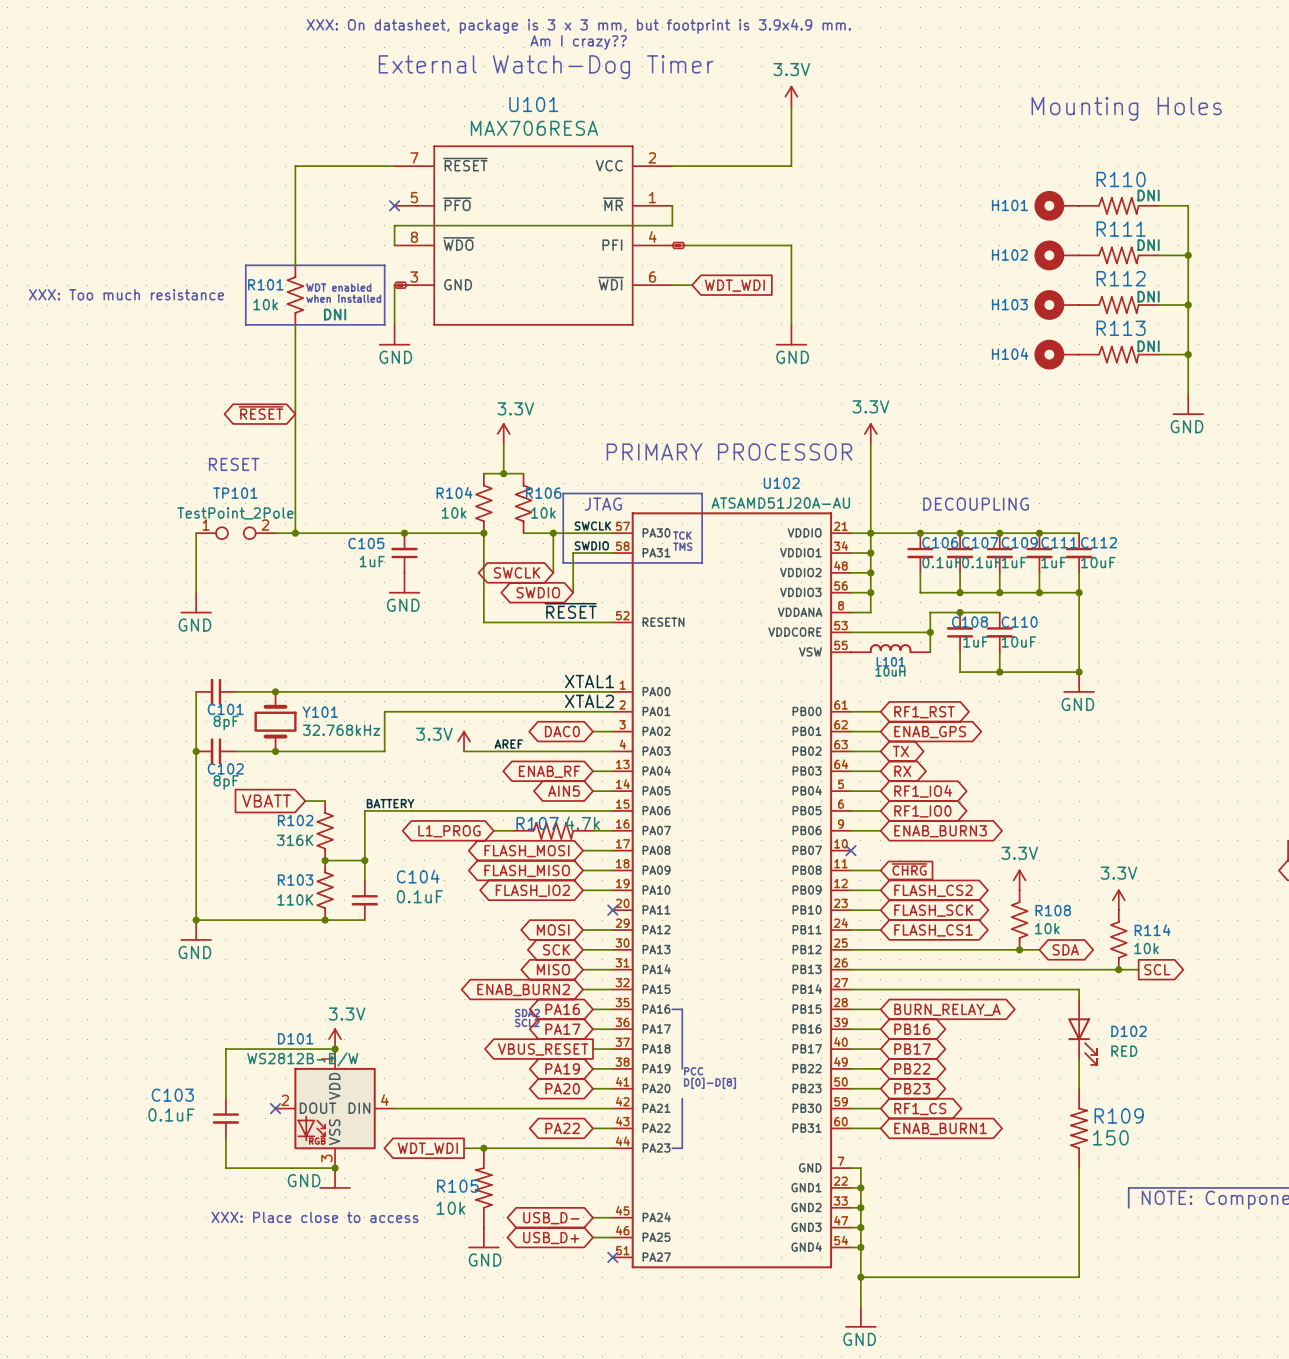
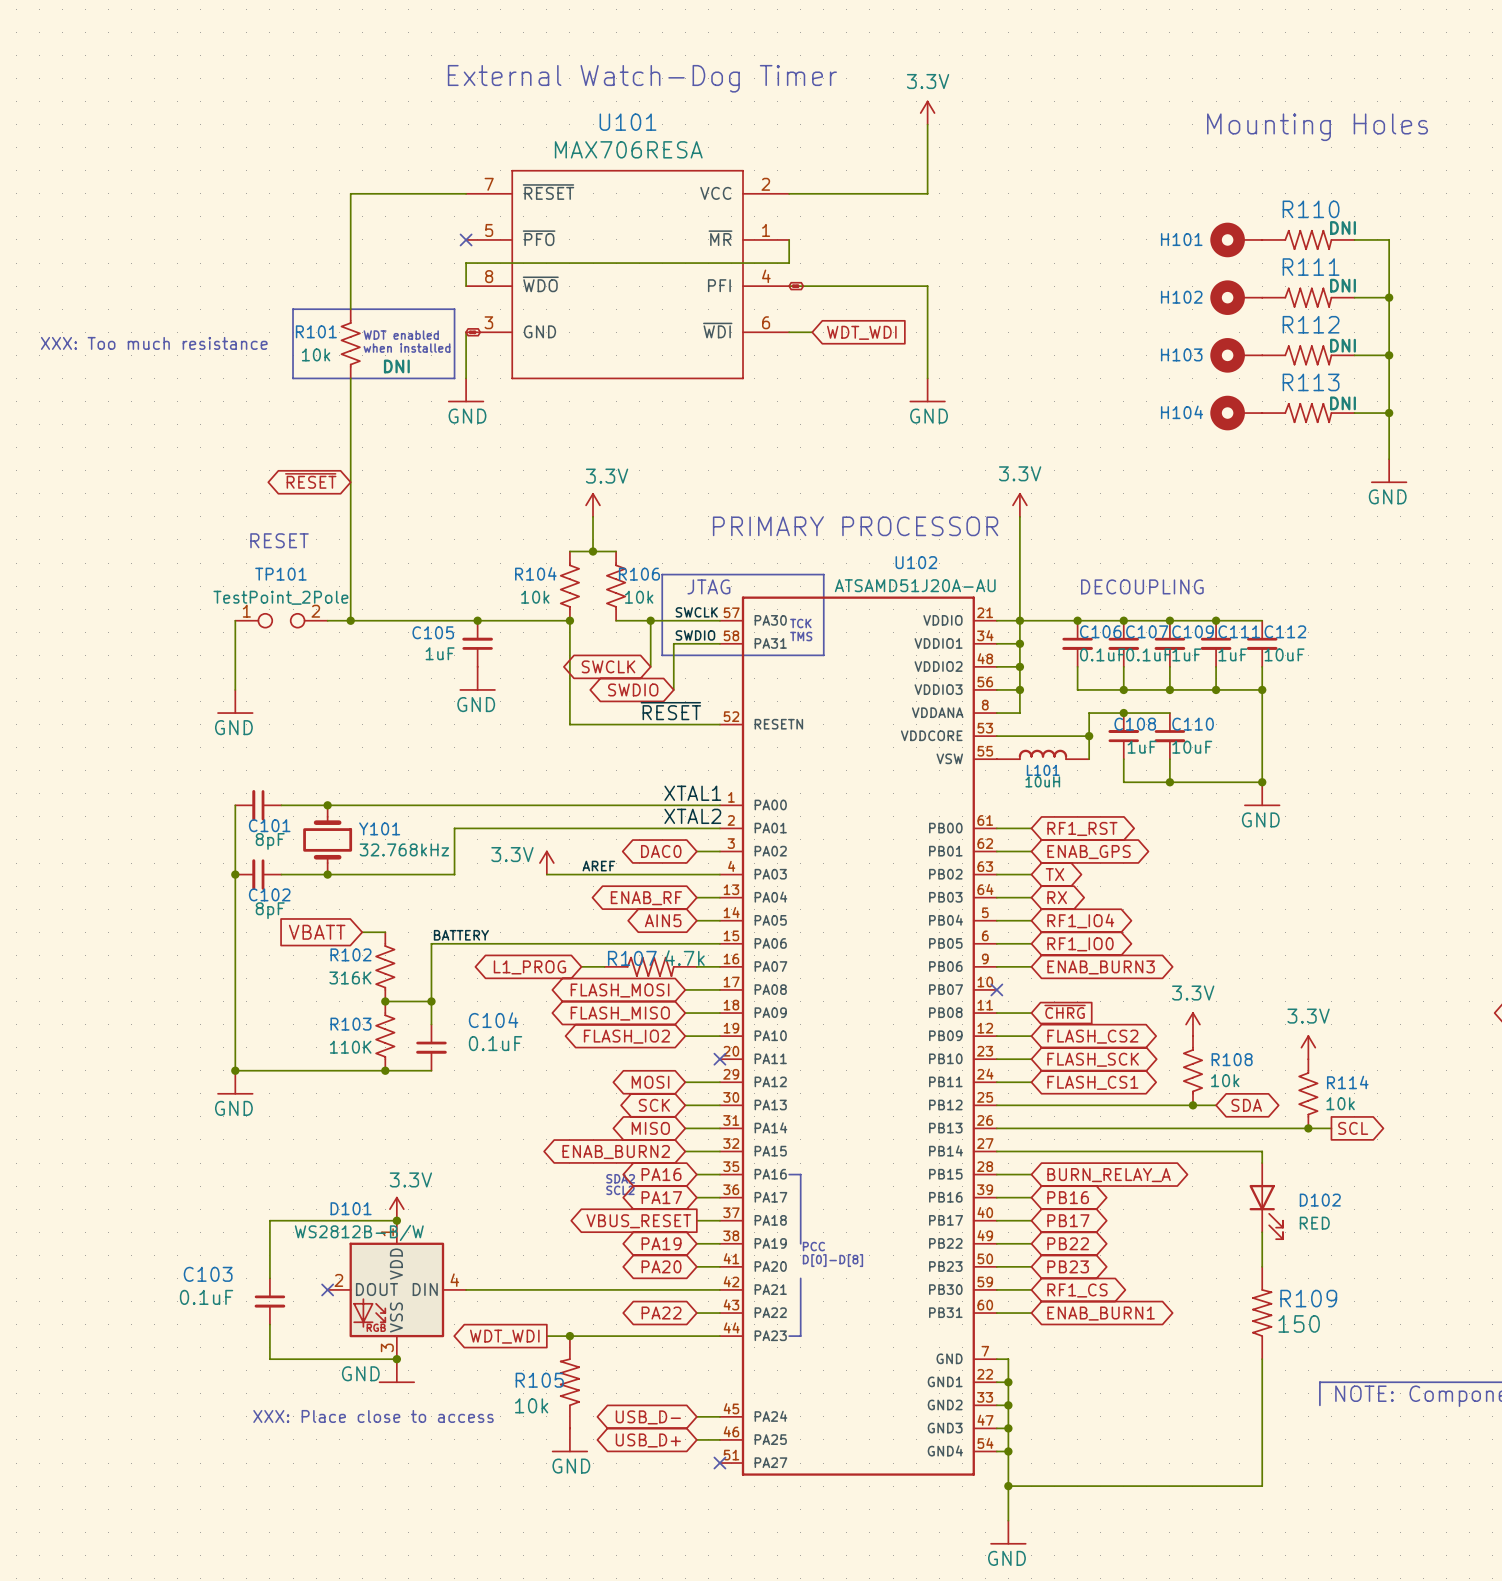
text: XXX: On datasheet, package is 3 x 3 mm, but footprint is 3.9x4.9 mm. (578, 26) -> none
text: Am I crazy?? (578, 42) -> none

